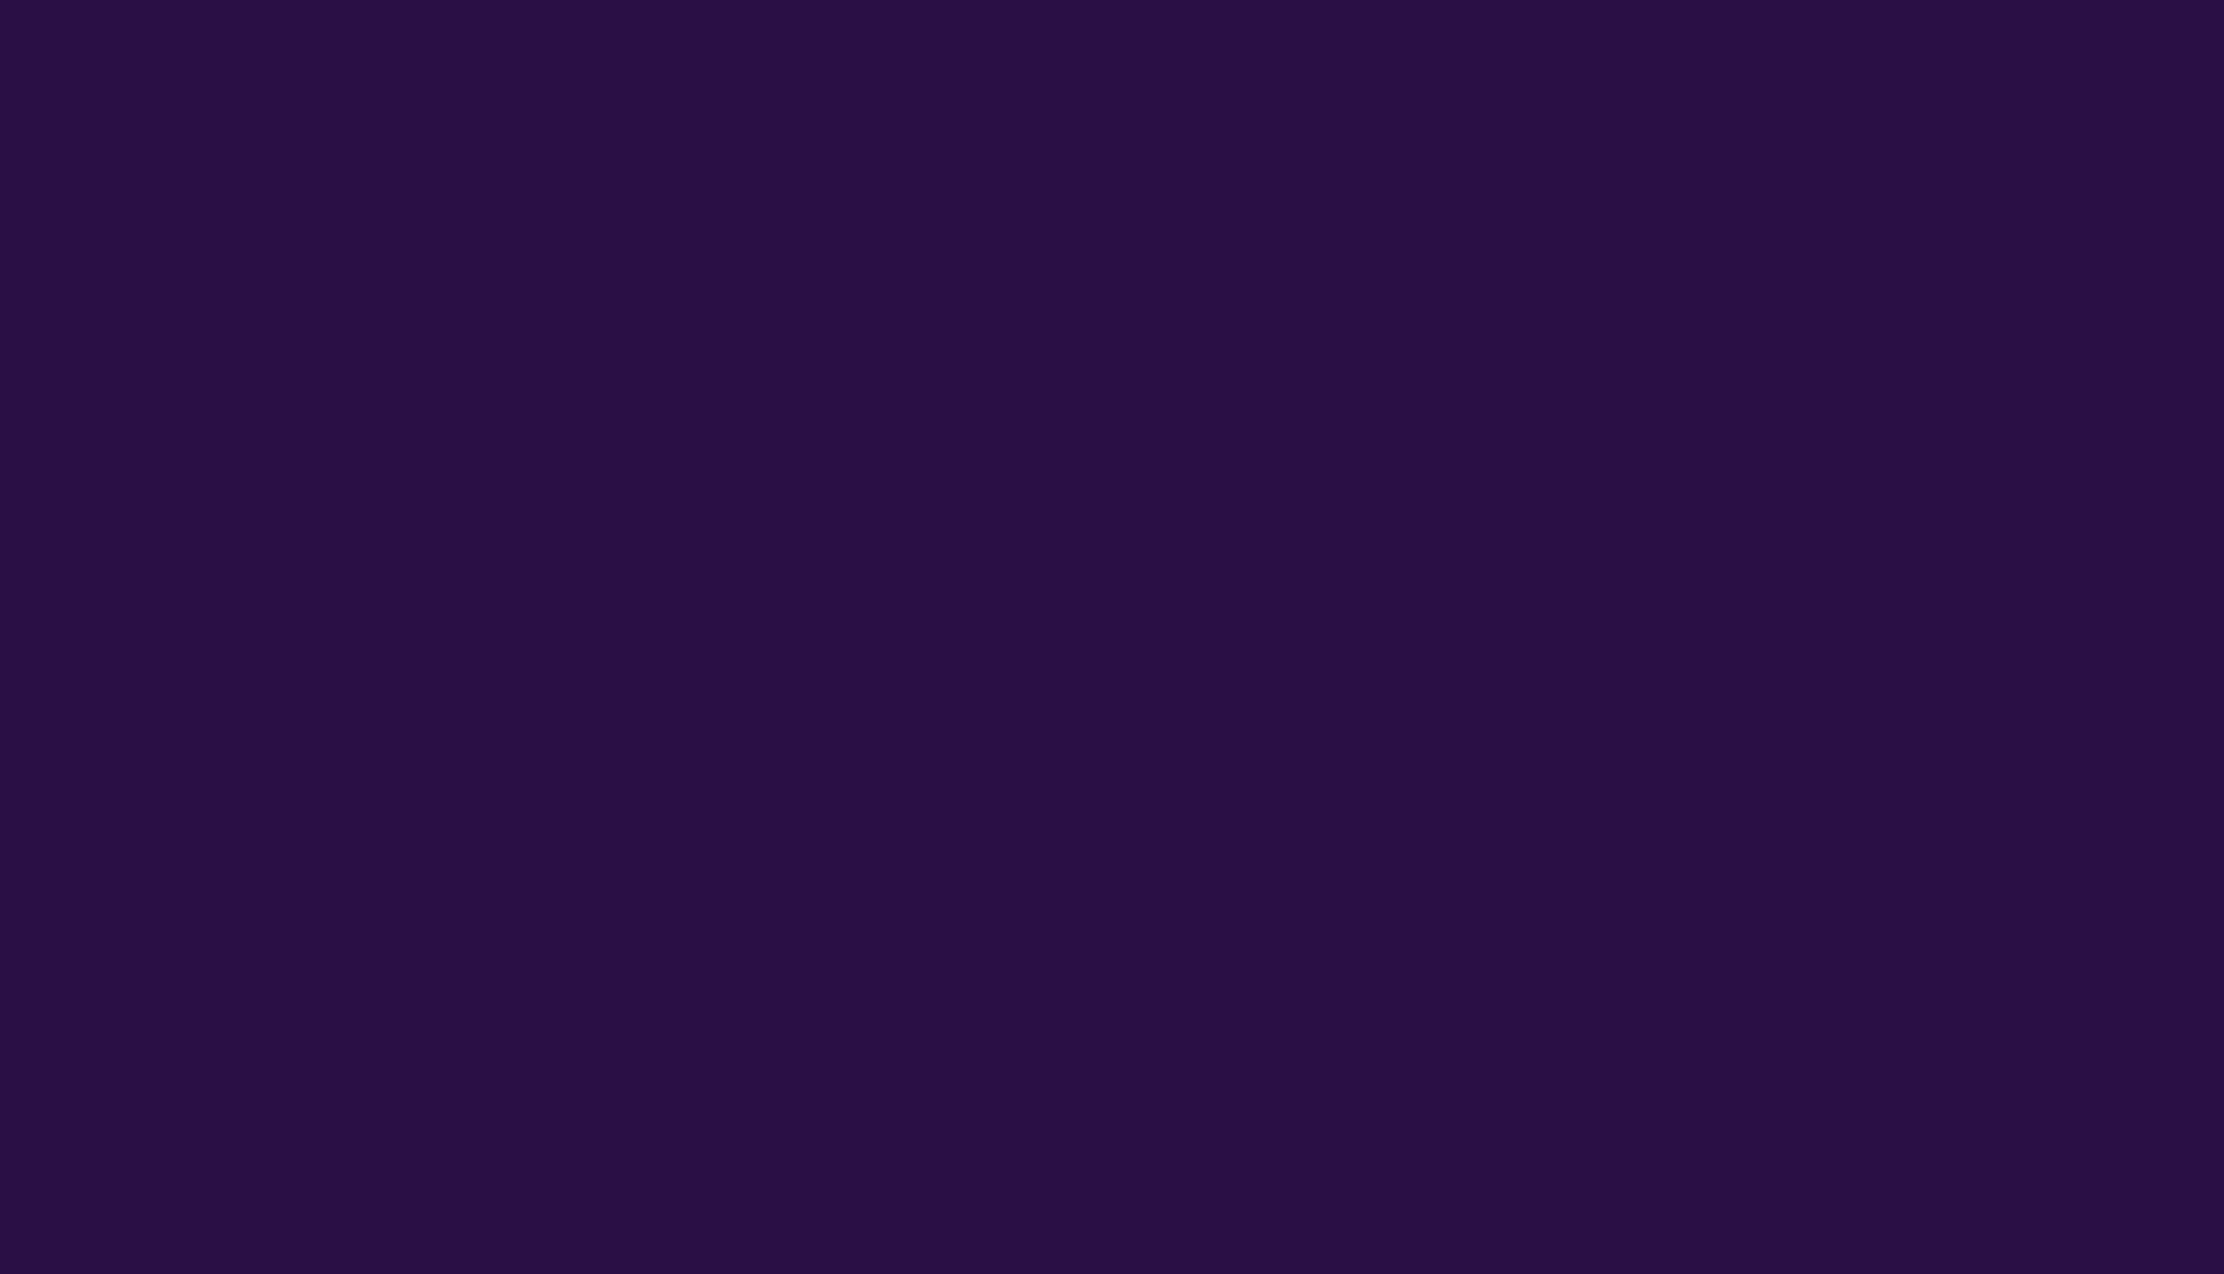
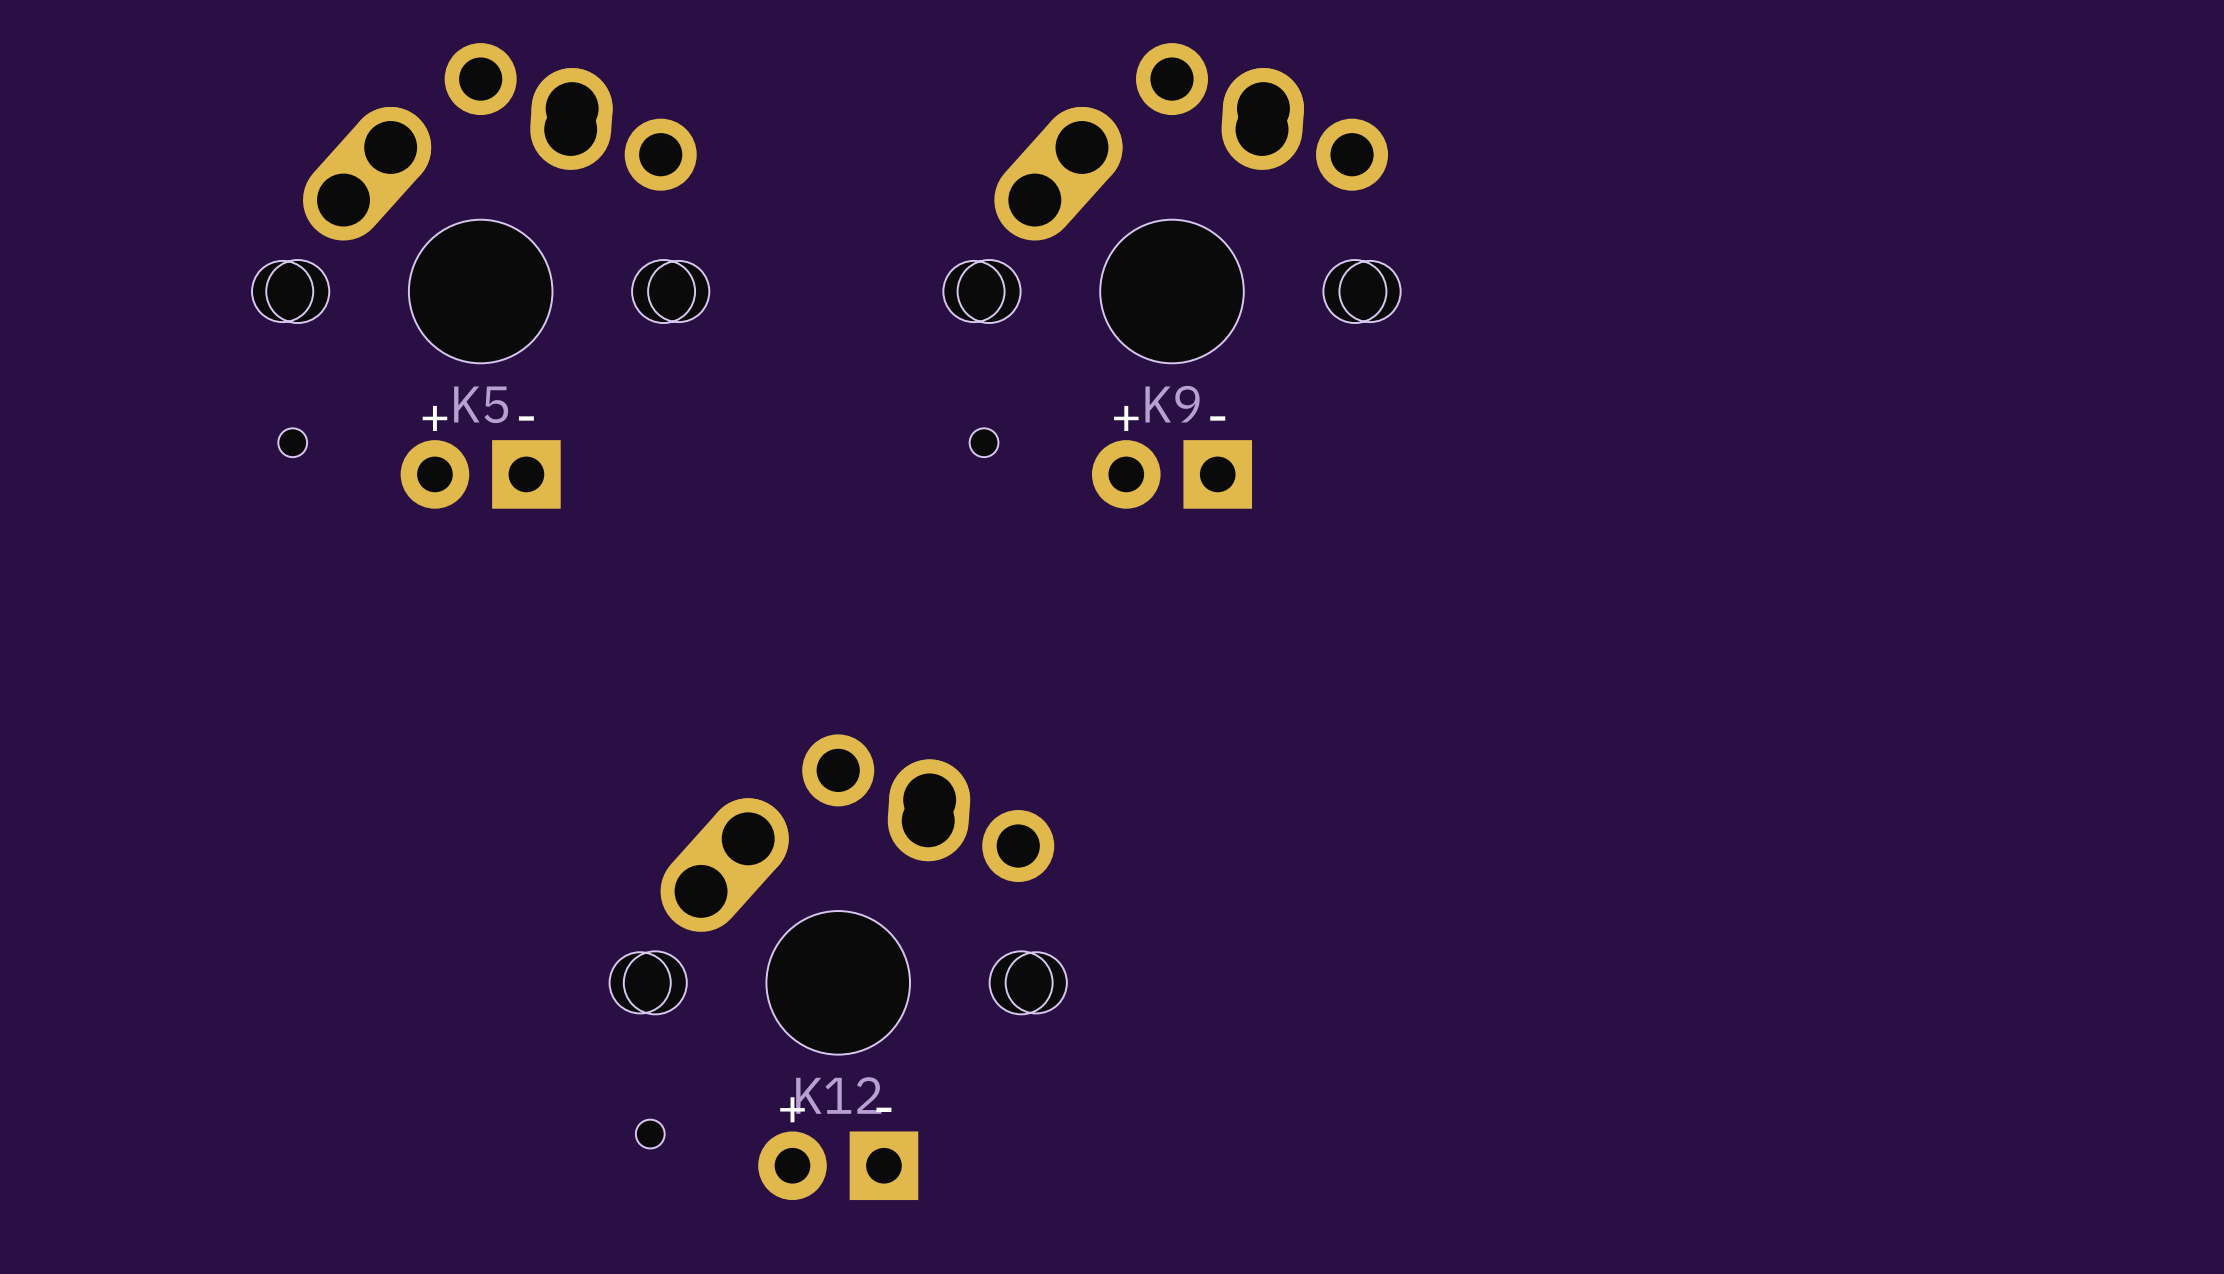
K5: none -> (480, 275)
K9: none -> (1172, 275)
K12: none -> (838, 967)

